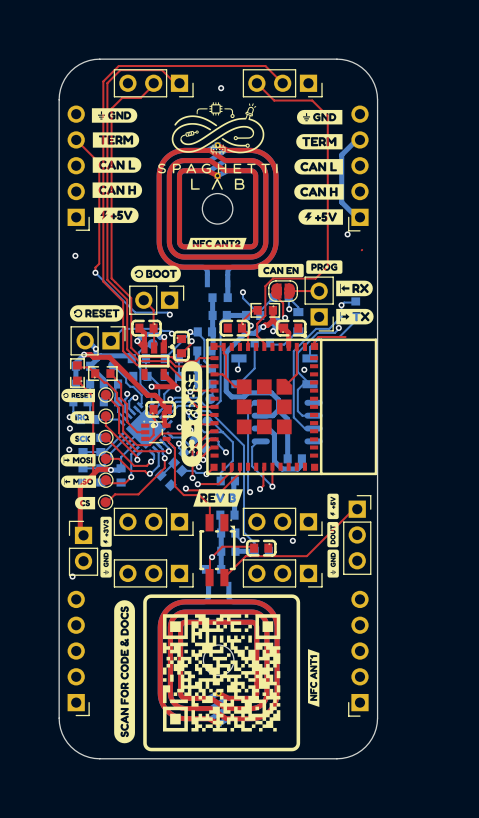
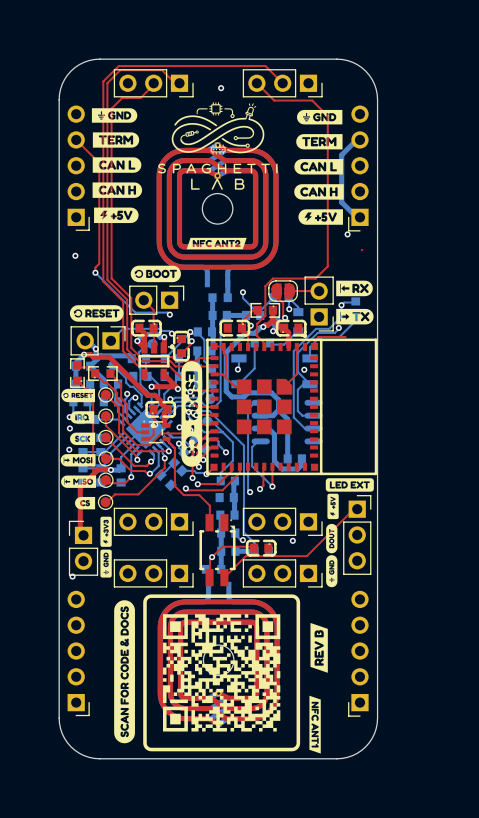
drawing: [258, 260, 343, 278] -> none
drawing: none -> [325, 478, 374, 492]
drawing: [193, 489, 244, 507] -> none
drawing shape: [327, 521, 339, 548] -> [326, 523, 338, 554]
drawing shape: [327, 549, 339, 578] -> [326, 555, 338, 588]
drawing: none -> [310, 622, 328, 673]
drawing: [307, 649, 320, 707] -> none
drawing: none -> [309, 695, 321, 754]

